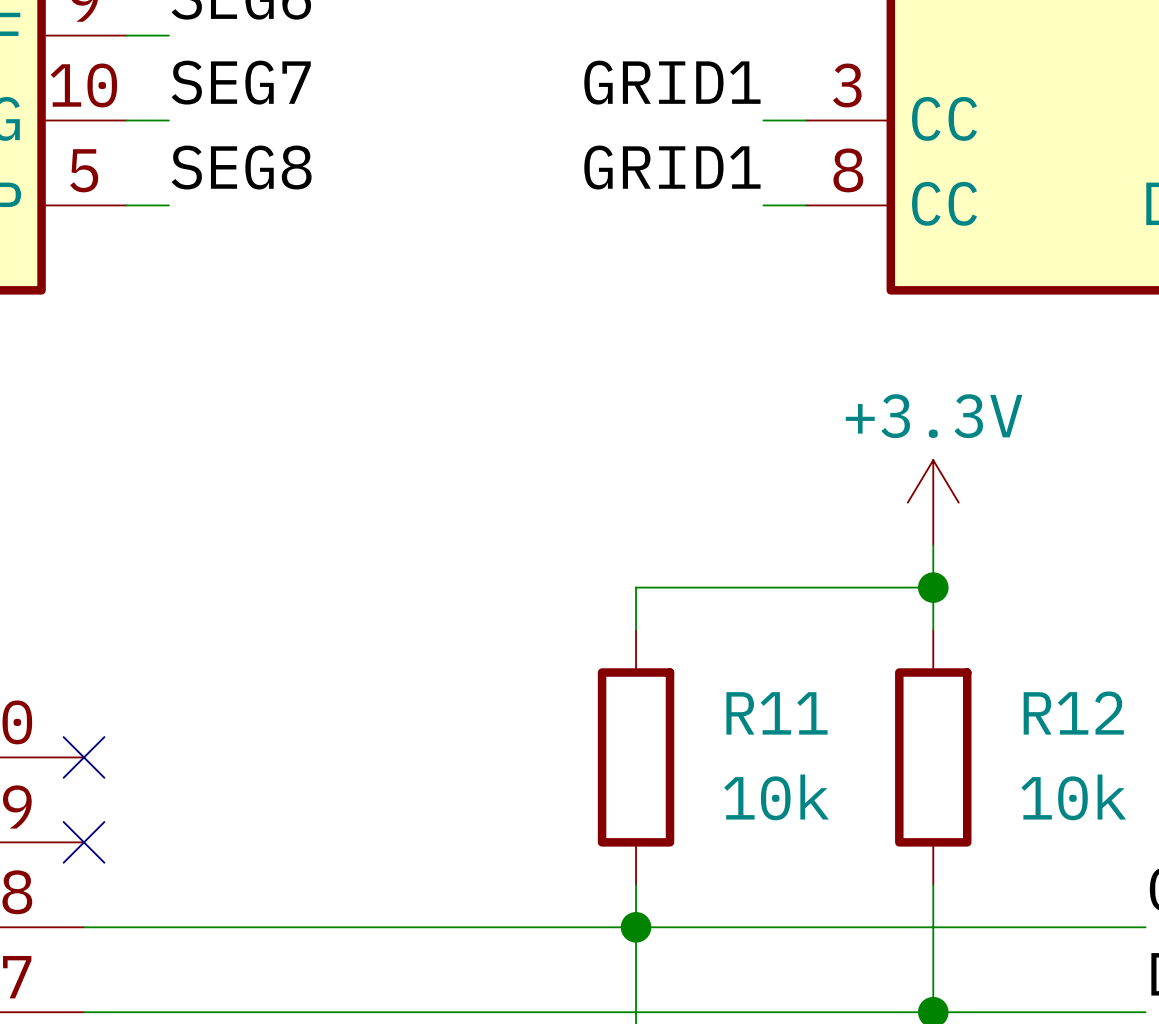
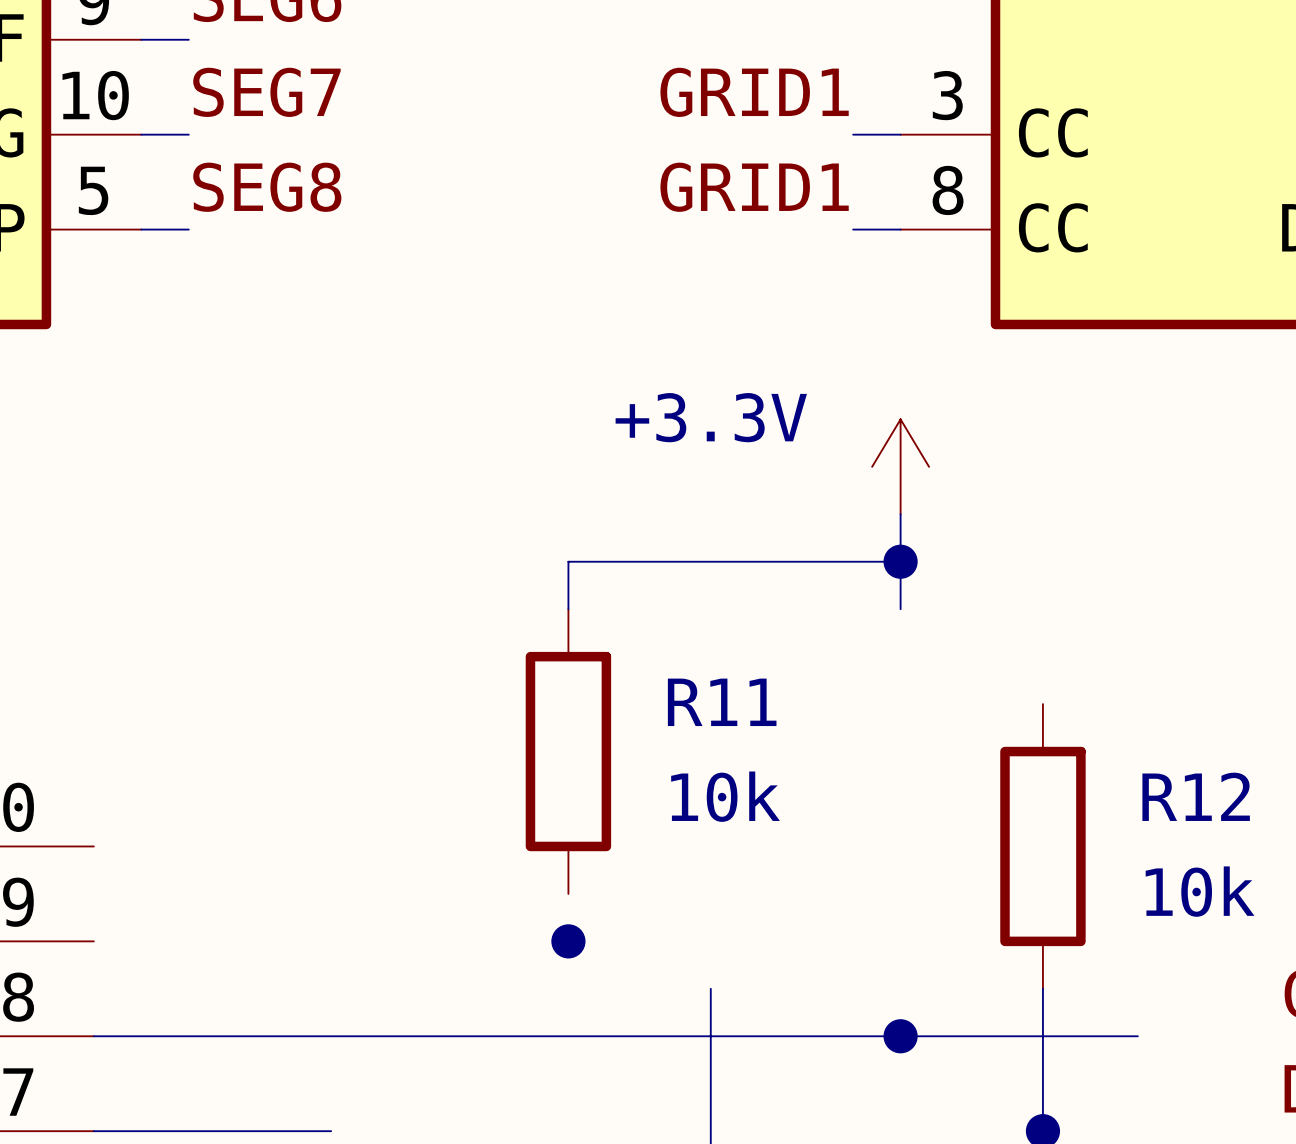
power symbol text position: +3.3V (934, 416) -> +3.3V (711, 417)
power symbol position: +3.3V (933, 502) -> +3.3V (900, 466)
wire: (933, 545) (933, 630) -> (900, 514) (900, 609)
wire: (933, 587) (636, 587) (636, 630) -> (900, 561) (568, 561) (568, 609)
junction position: (933, 587) -> (900, 561)
no-connect mark: (84, 757) -> none
R11 position: (636, 757) -> (568, 751)
no-connect mark: (84, 842) -> none
junction: none -> (568, 941)
junction: (636, 927) -> none
junction: none -> (900, 1036)
wire: (1018, 927) (1145, 927) -> none
wire: (296, 1012) (1145, 1012) -> none

